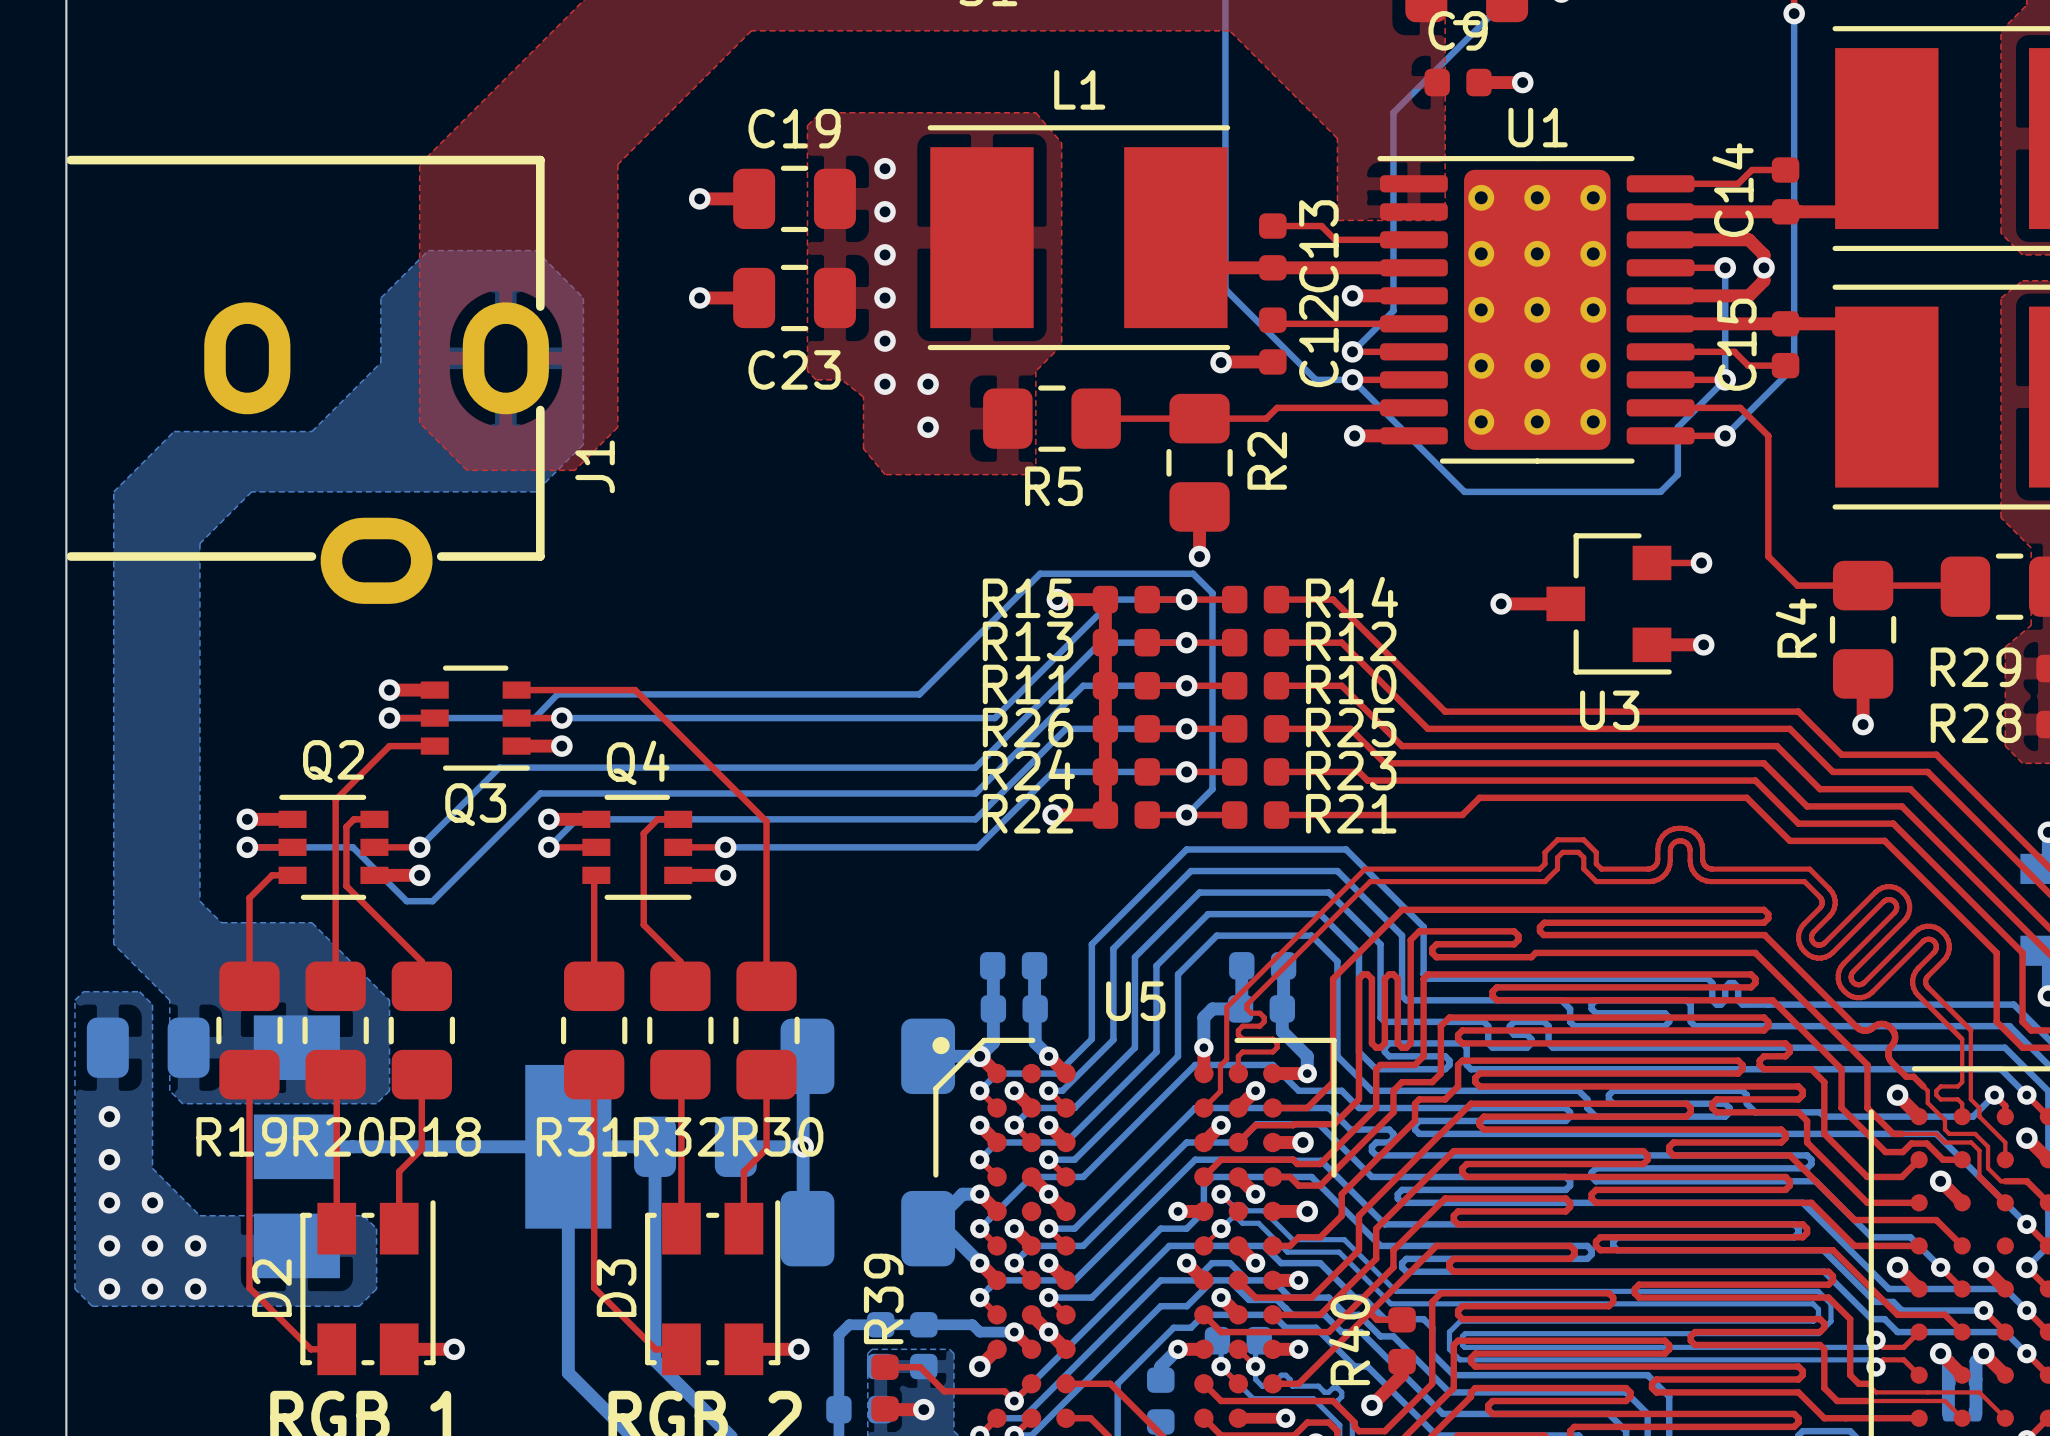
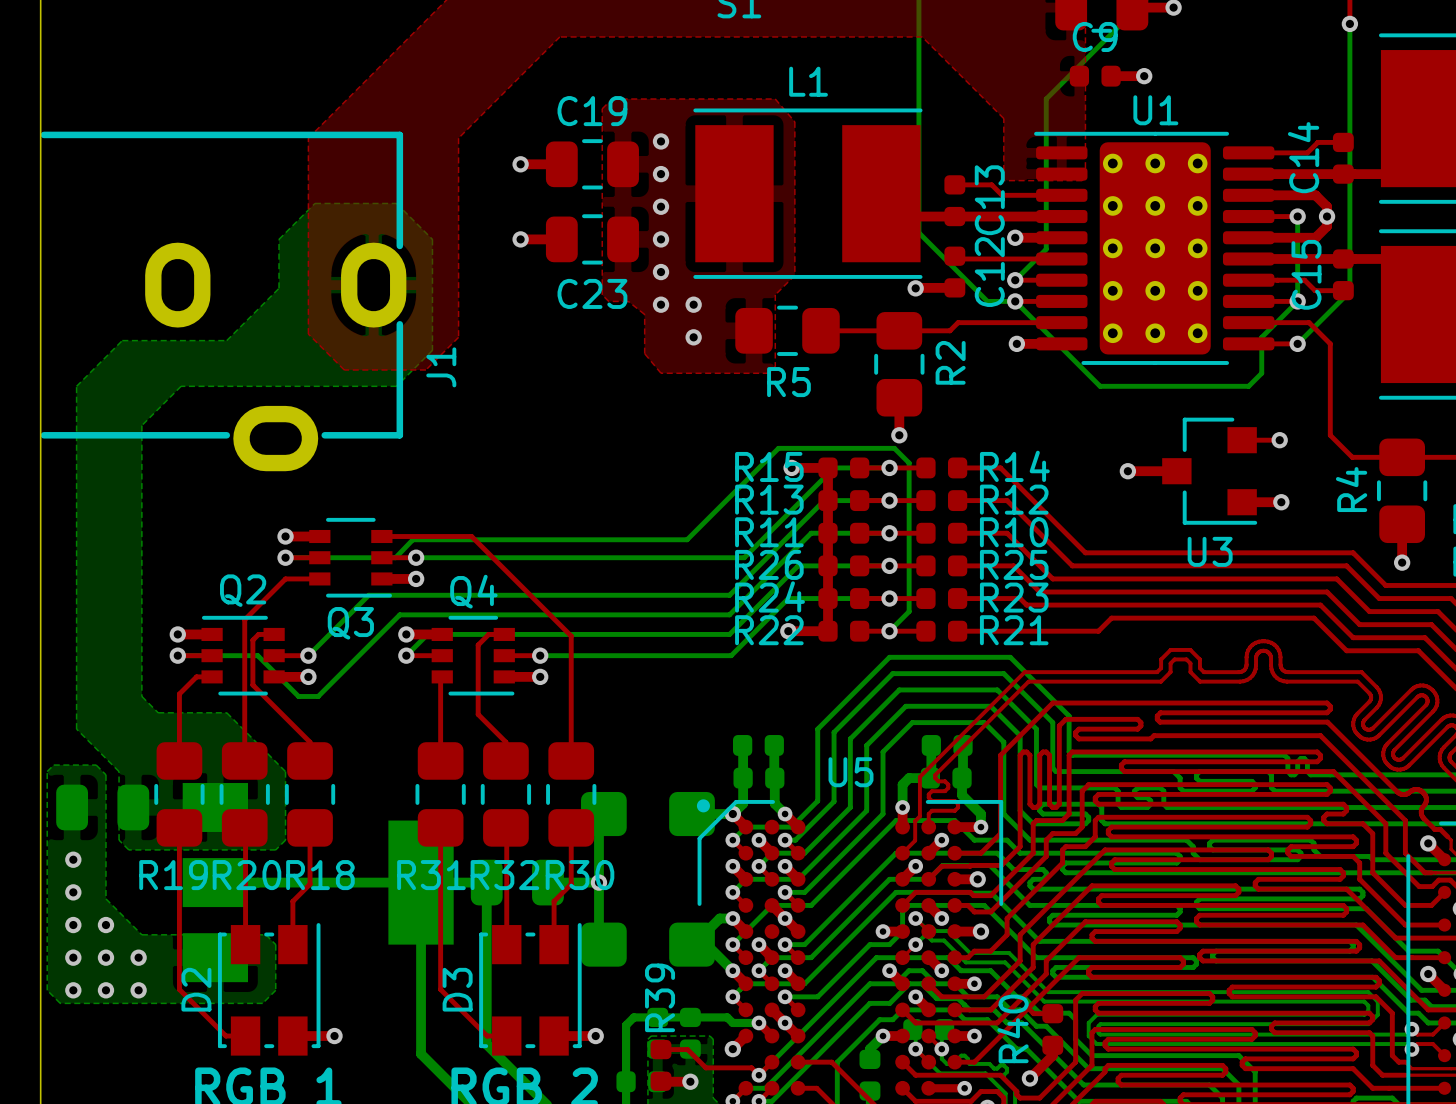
part footprint: [780, 1018, 956, 1095] -> [581, 791, 715, 837]
part footprint: [780, 1190, 956, 1267] -> [581, 922, 715, 967]

